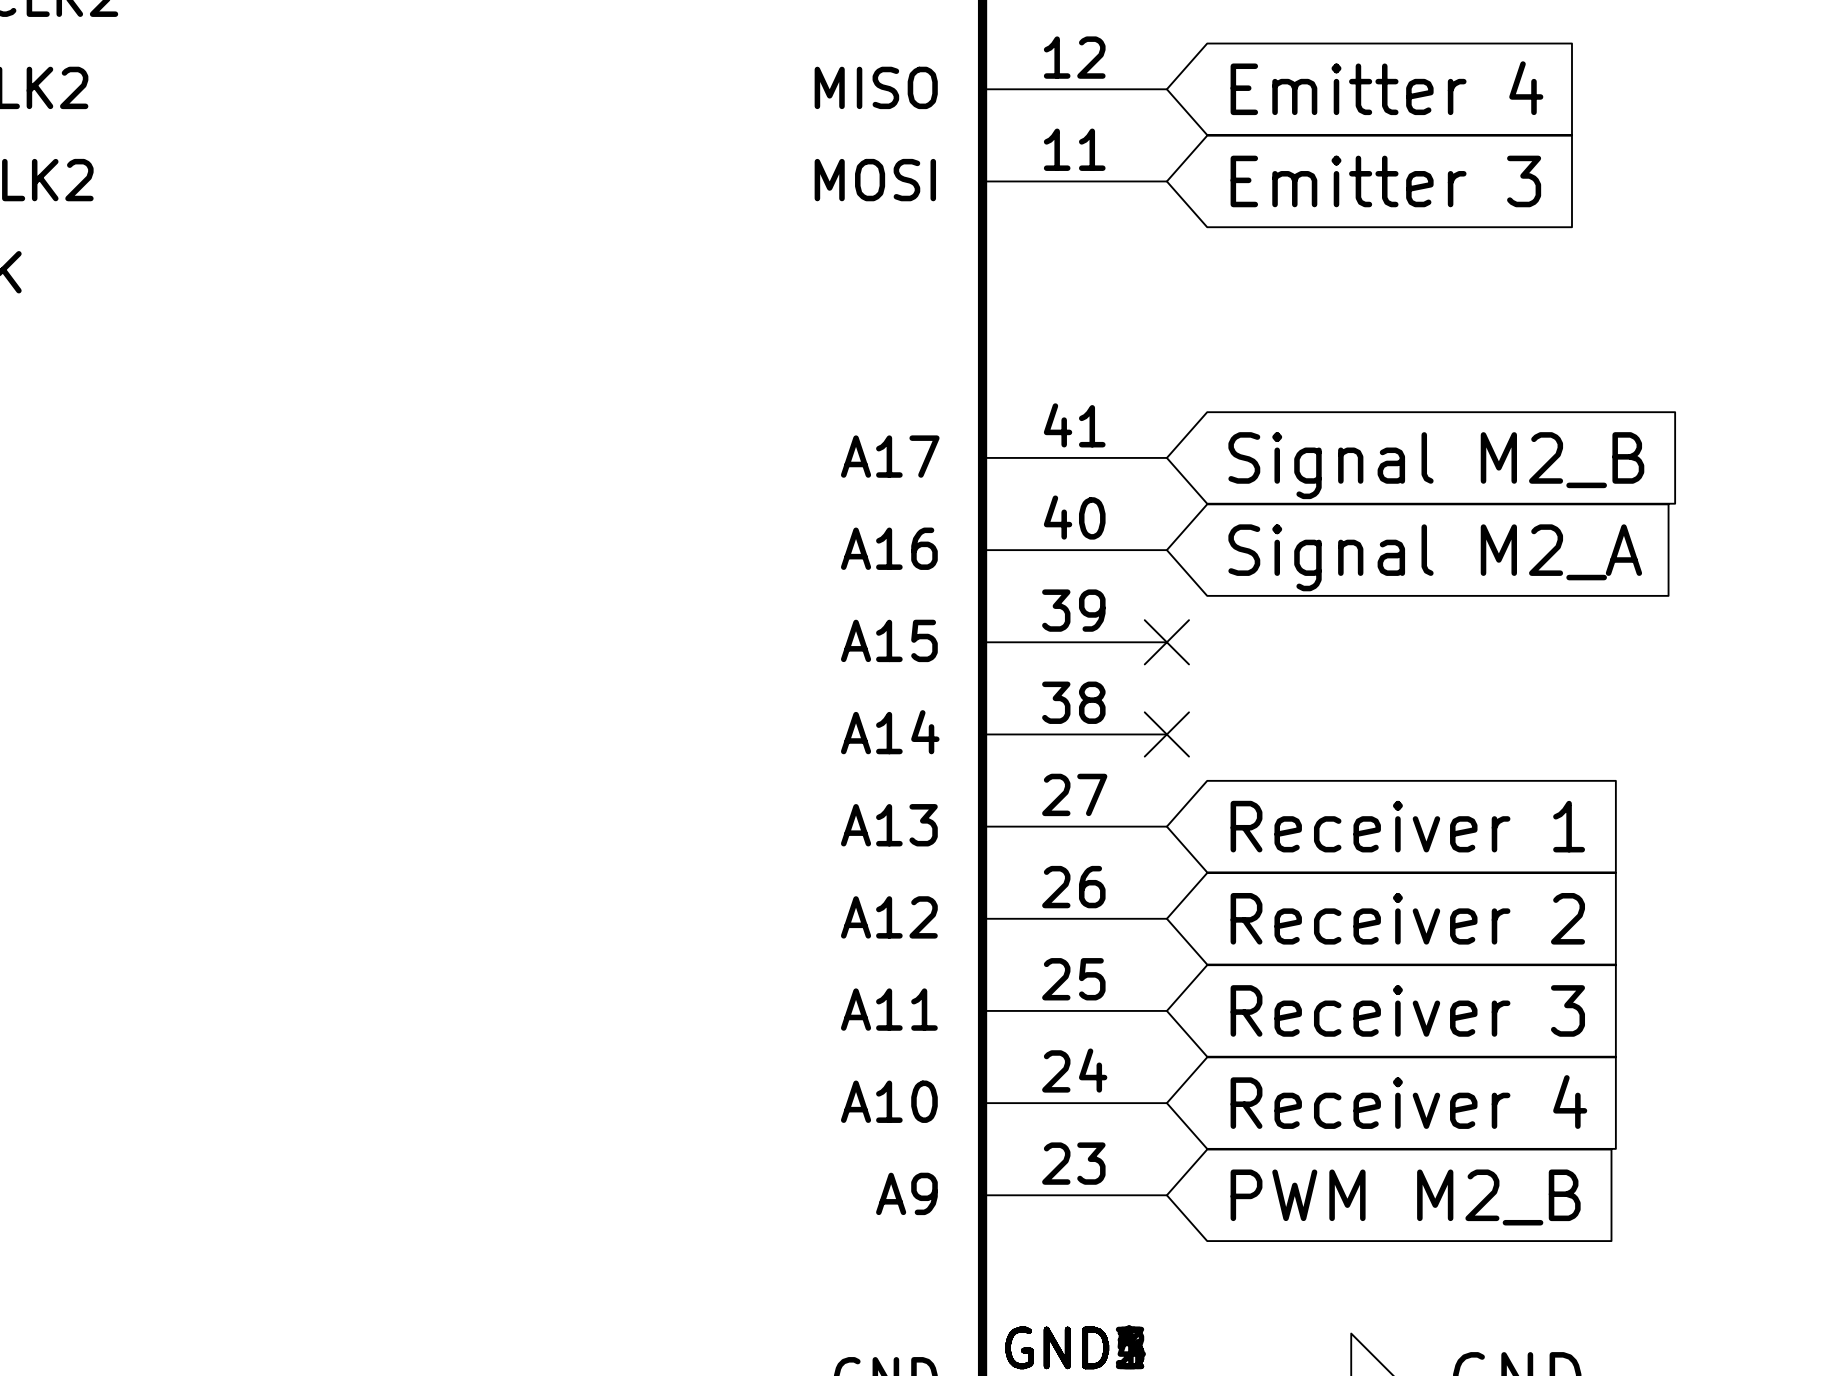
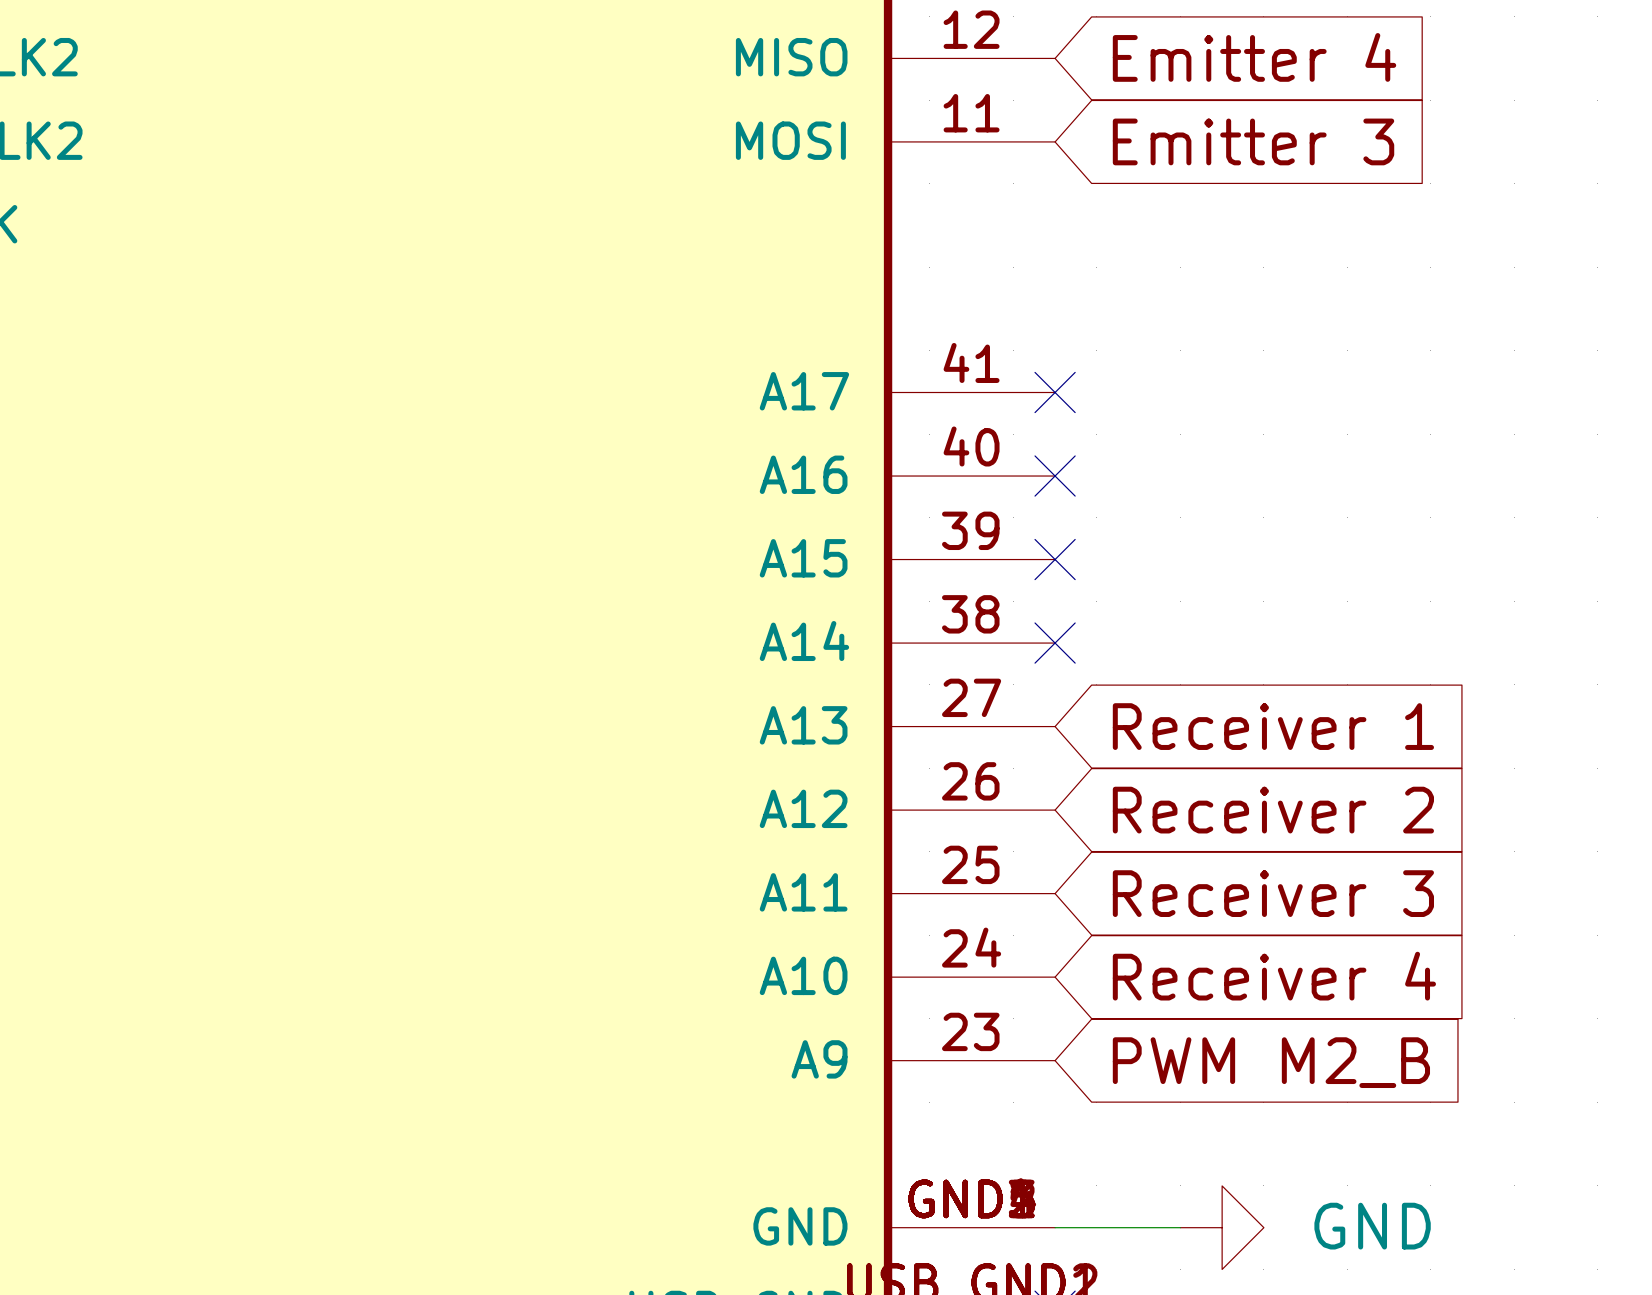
no-connect mark: none -> (1055, 392)
global label: Signal M2_B (1436, 465) -> none
no-connect mark: none -> (1055, 476)
global label: Signal M2_A (1435, 557) -> none

